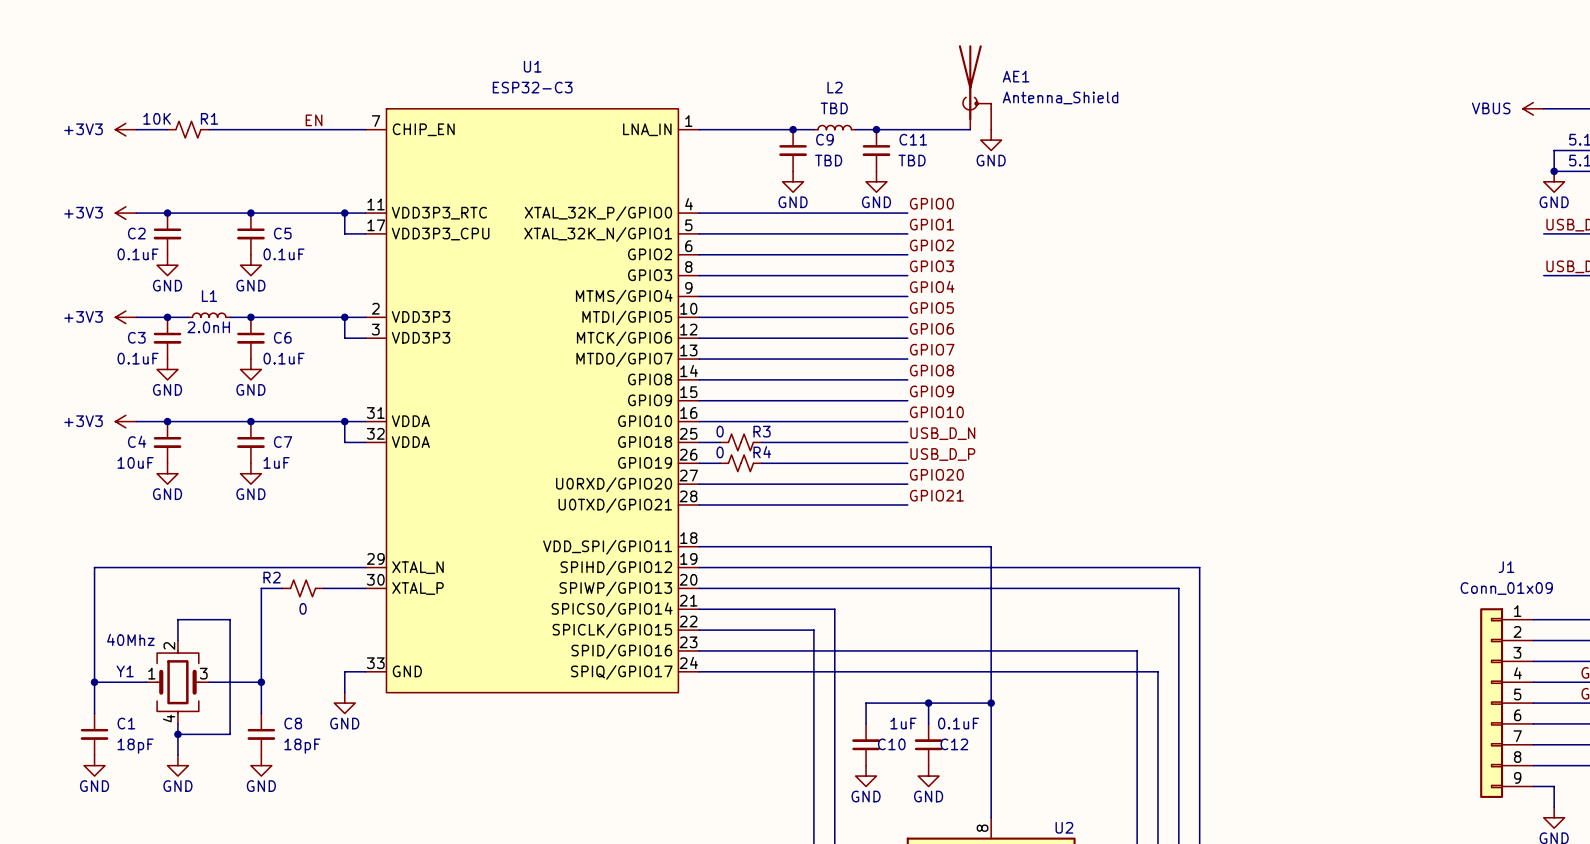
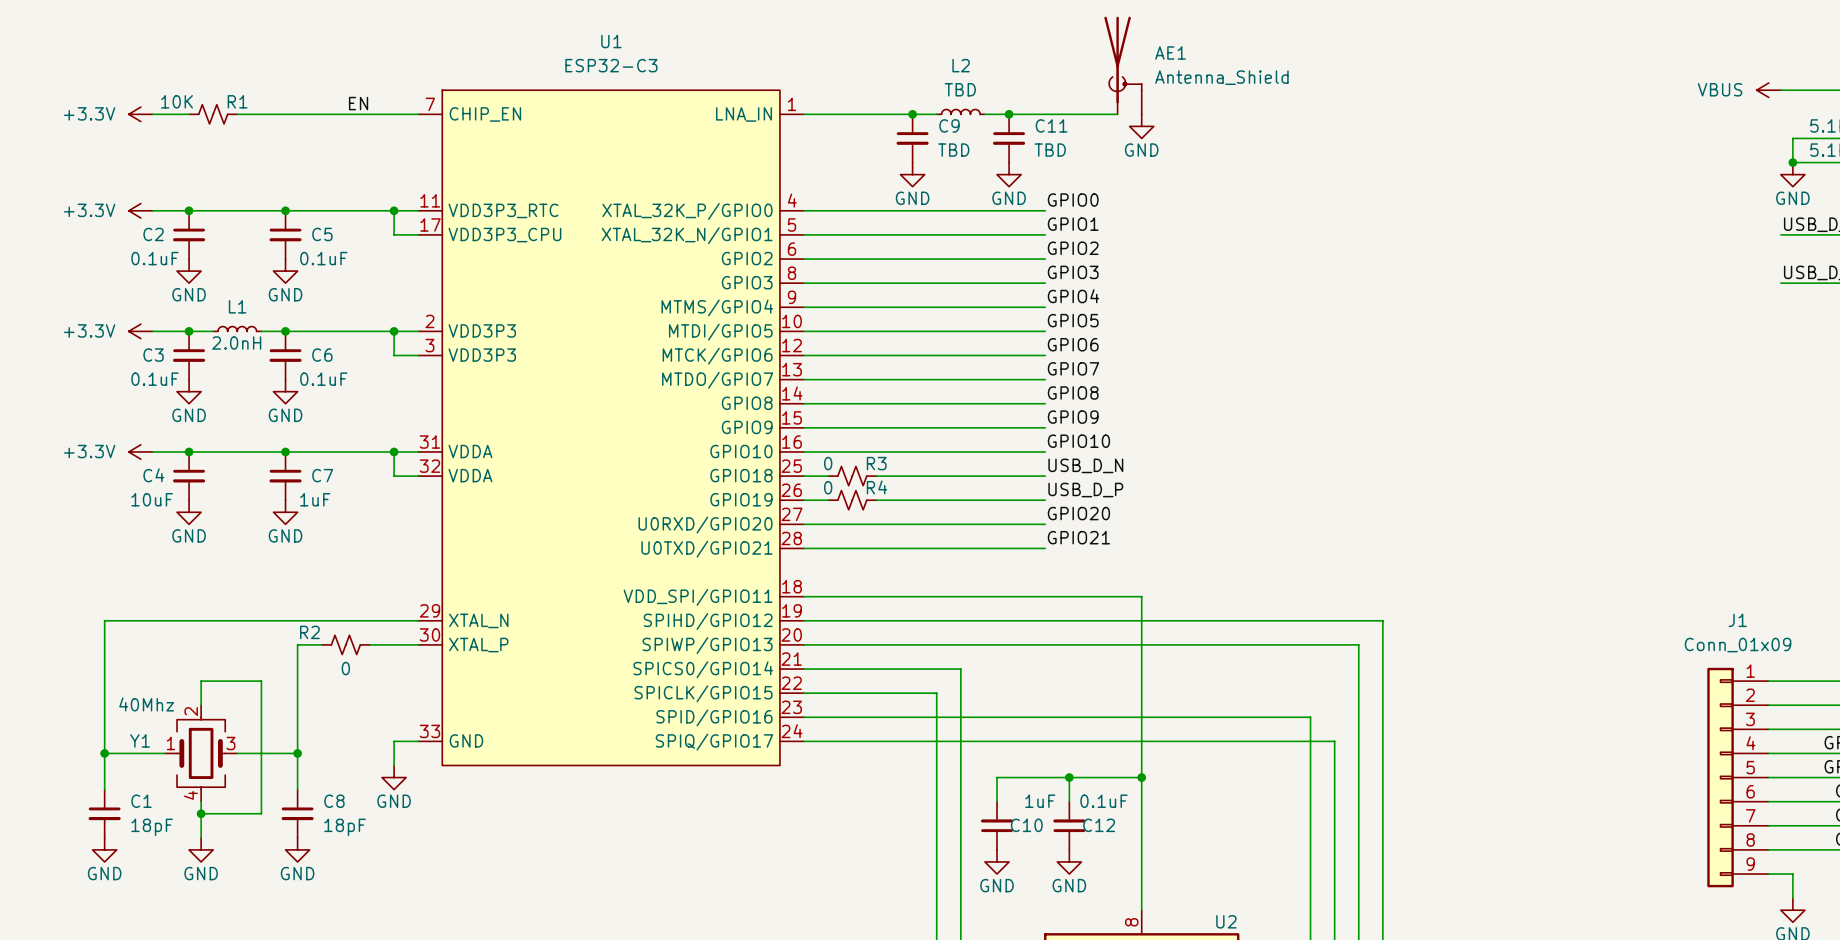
power symbol: +3V3 (125, 129) -> +3.3V (140, 114)
power symbol: +3V3 (125, 213) -> +3.3V (140, 210)
power symbol: +3V3 (125, 317) -> +3.3V (140, 331)
power symbol: +3V3 (125, 421) -> +3.3V (140, 451)

